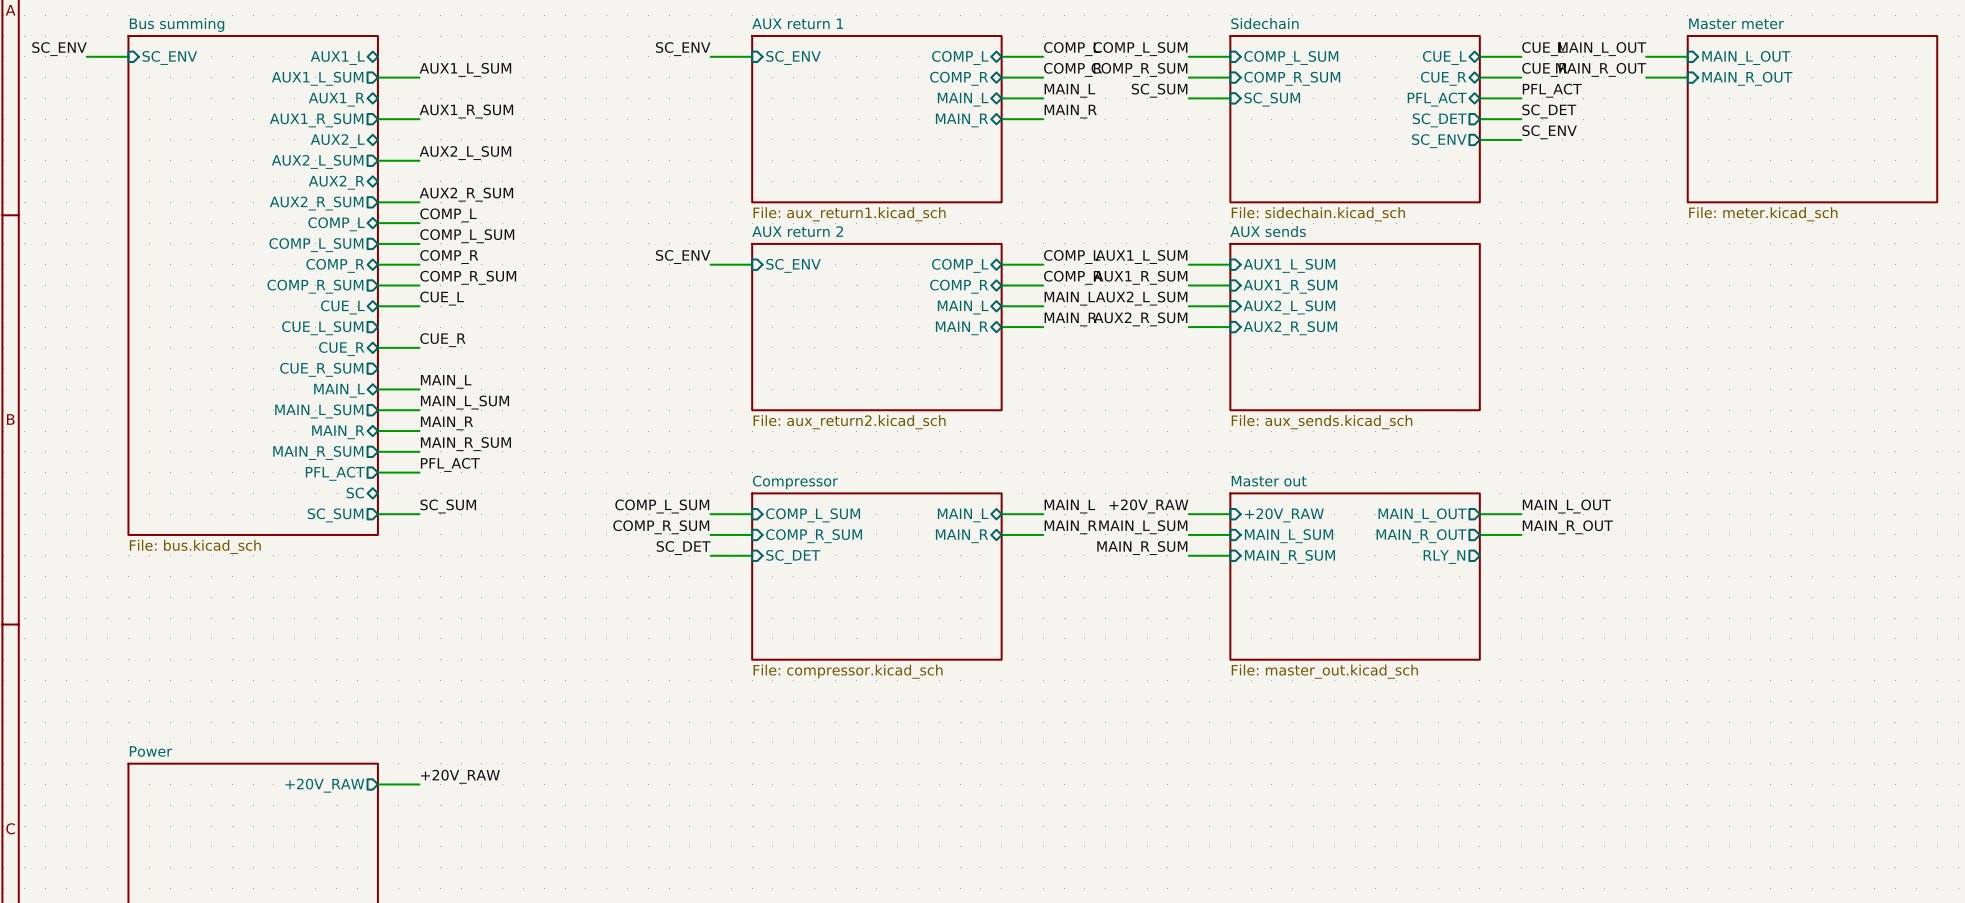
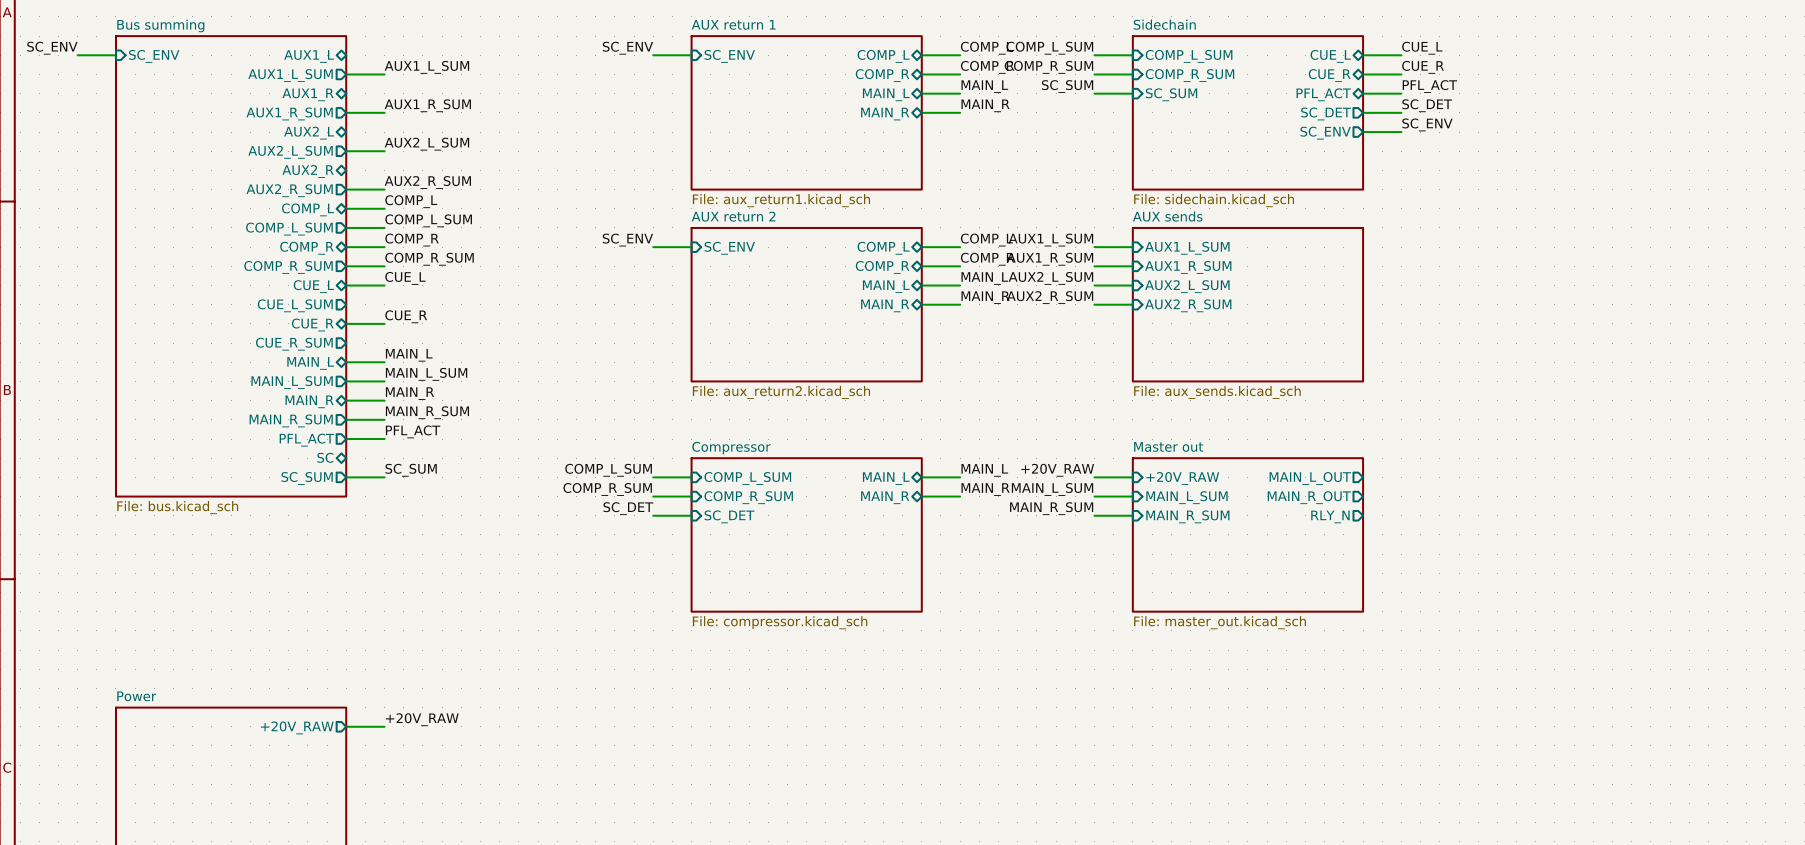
label: MAIN_L_OUT (1602, 49) -> none
wire: (1646, 56) (1687, 56) -> none
sheet pin: MAIN_L_OUT (1746, 58) -> none
label: MAIN_R_OUT (1601, 69) -> none
wire: (1646, 77) (1687, 77) -> none
sheet pin: MAIN_R_OUT (1747, 78) -> none
sheet Master meter: File: meter.kicad_sch (1812, 119) -> none
label: MAIN_L_OUT (1566, 506) -> none
wire: (1479, 514) (1521, 514) -> none
label: MAIN_R_OUT (1567, 527) -> none
wire: (1479, 534) (1521, 534) -> none

